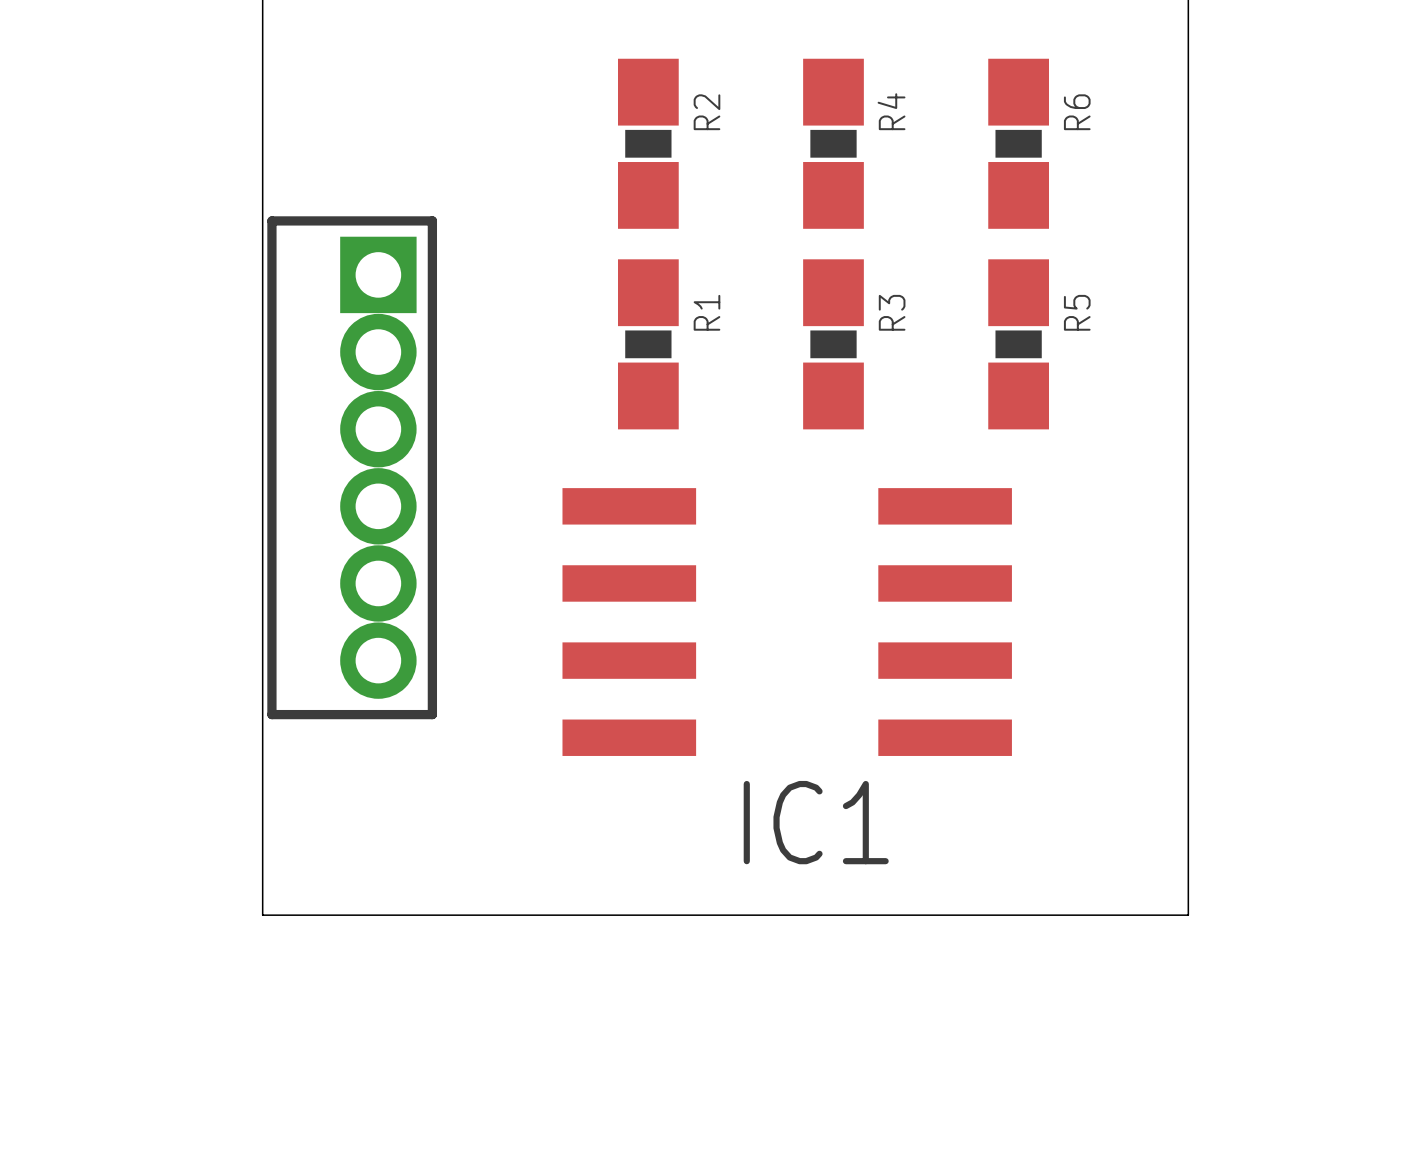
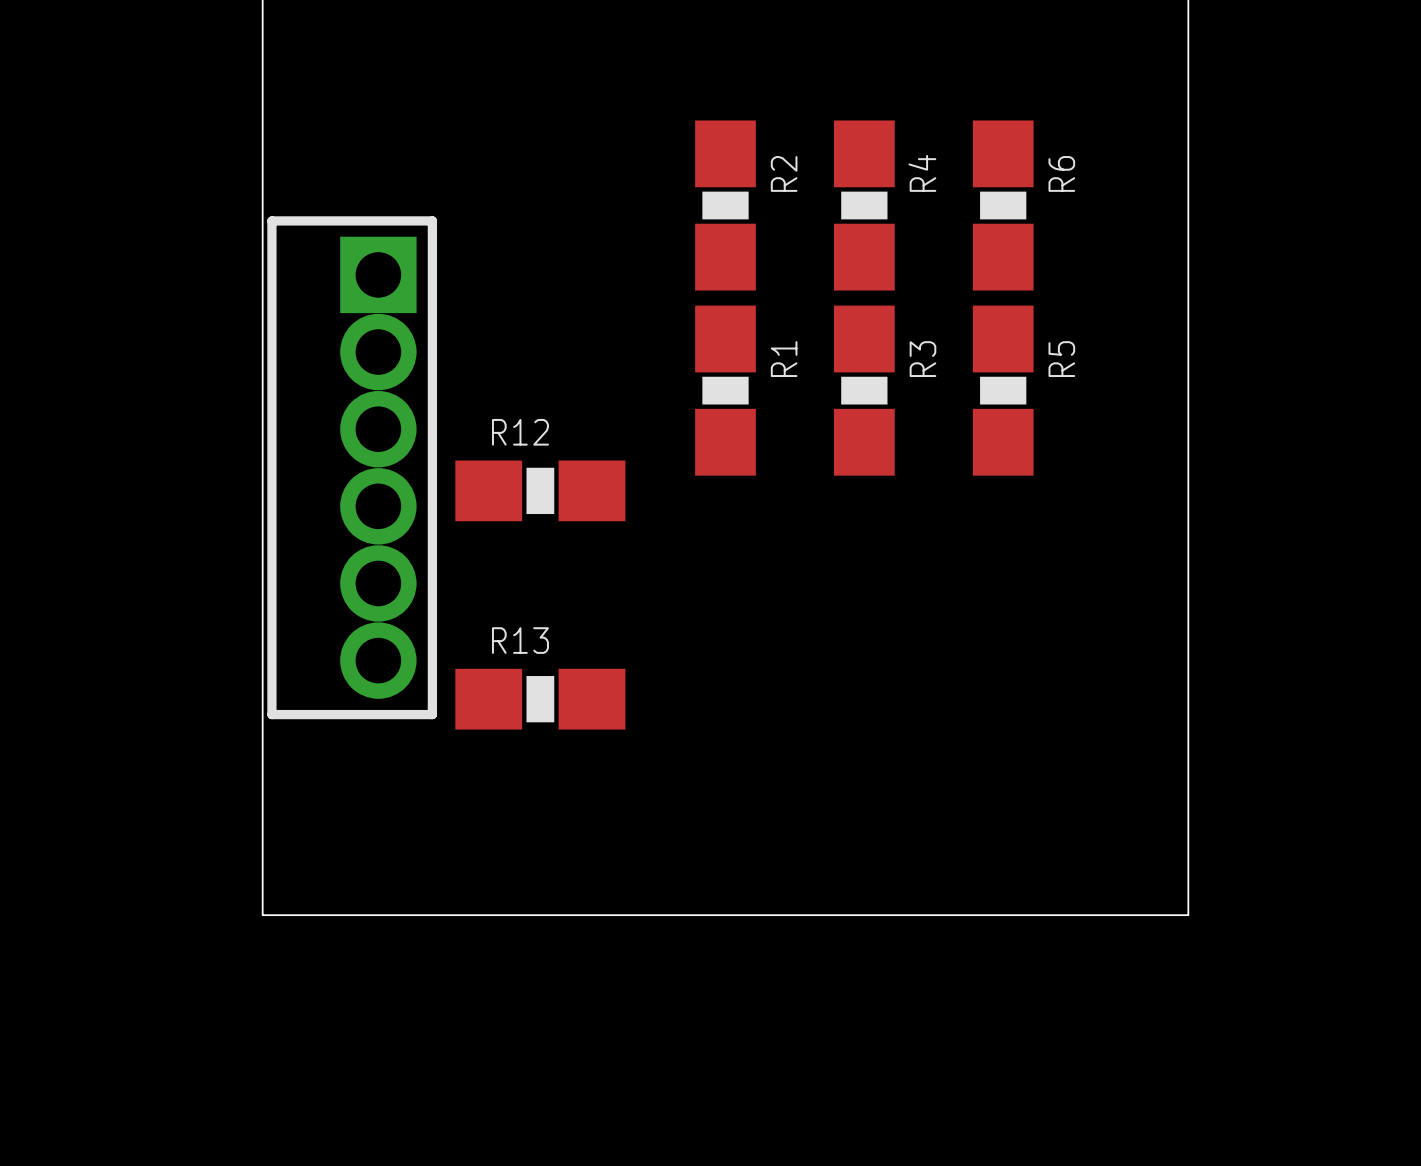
R2 position: (648, 143) -> (725, 205)
R4 position: (833, 143) -> (864, 205)
R6 position: (1018, 143) -> (1003, 205)
R1 position: (648, 344) -> (725, 390)
R3 position: (833, 344) -> (864, 390)
R5 position: (1018, 344) -> (1003, 390)
R12: none -> (540, 490)
IC1: (787, 622) -> none
R13: none -> (540, 699)

